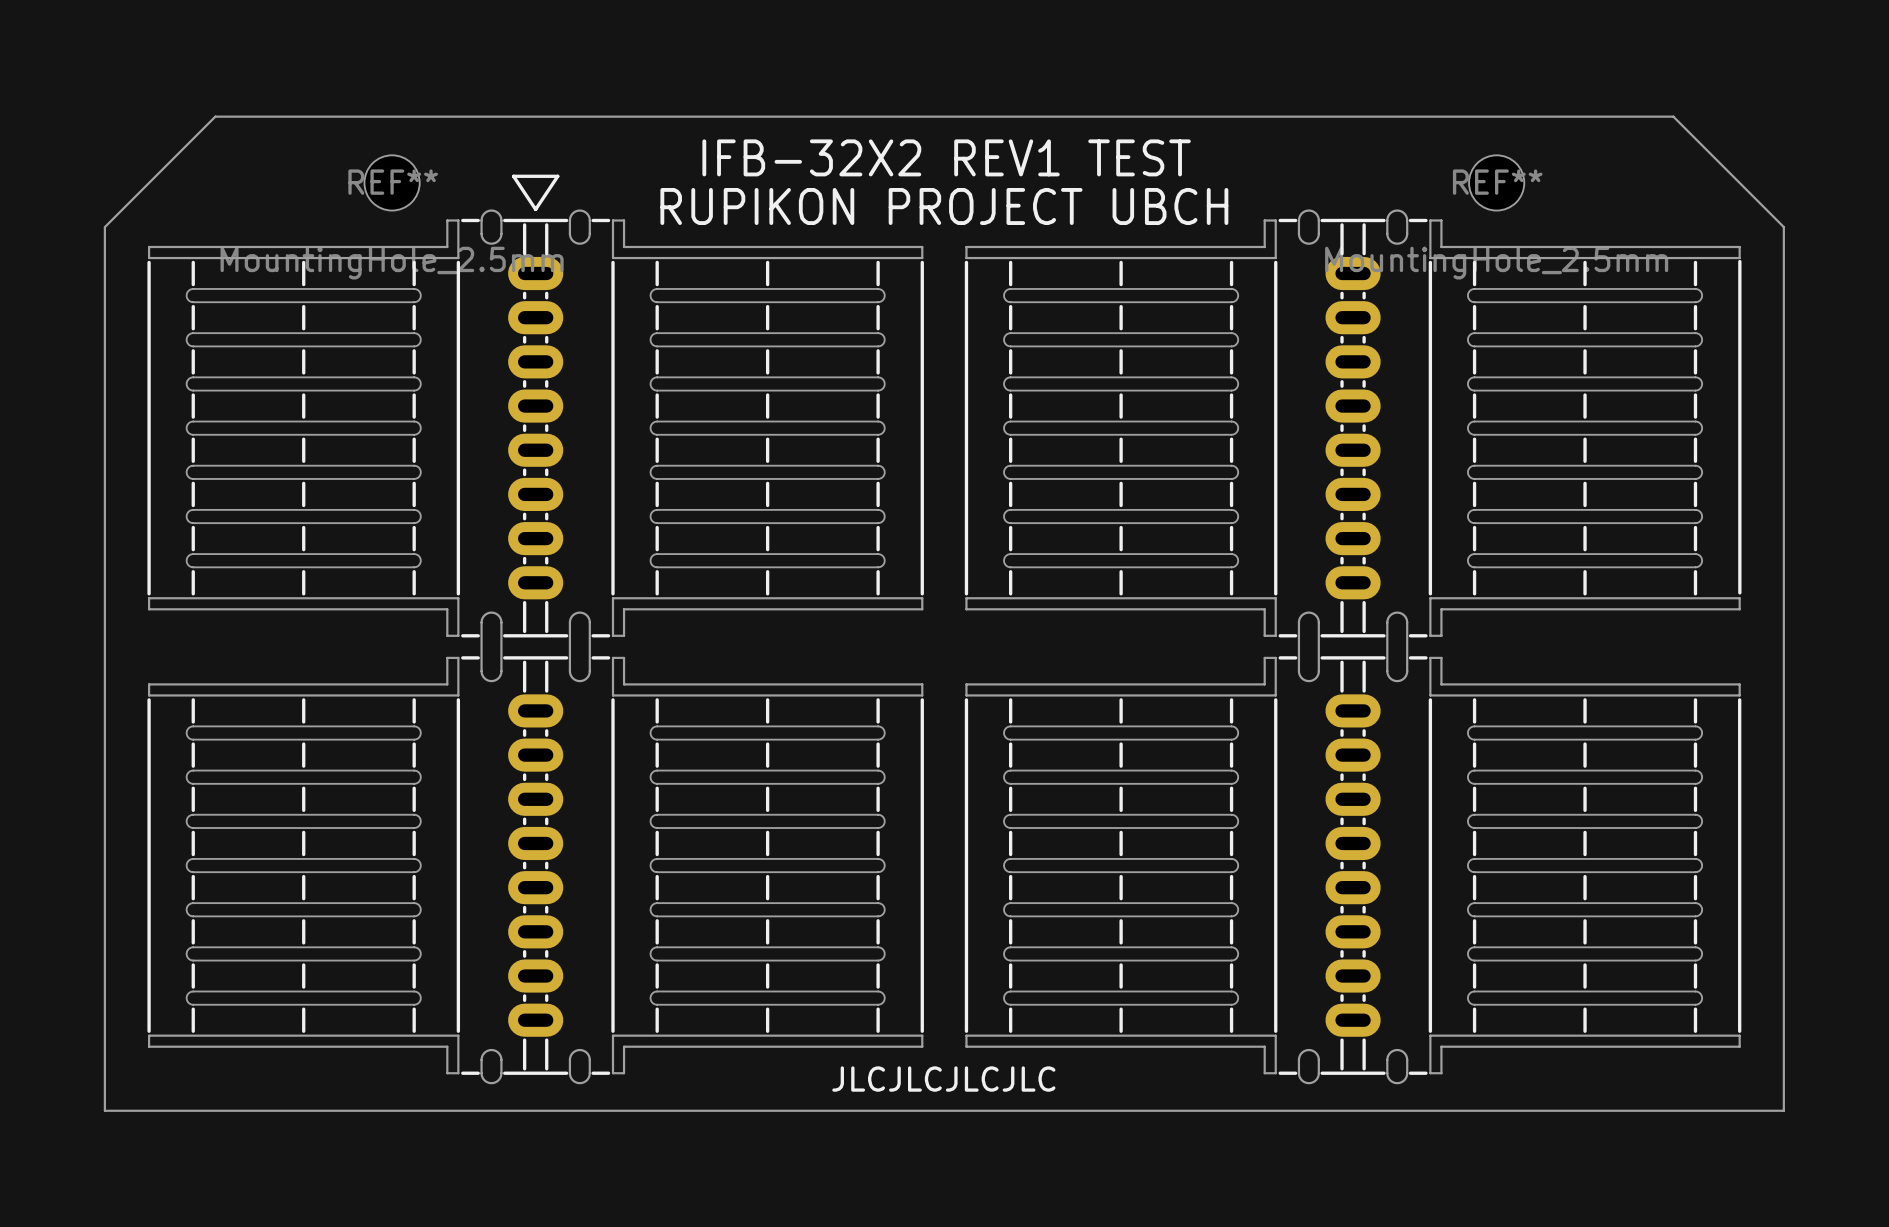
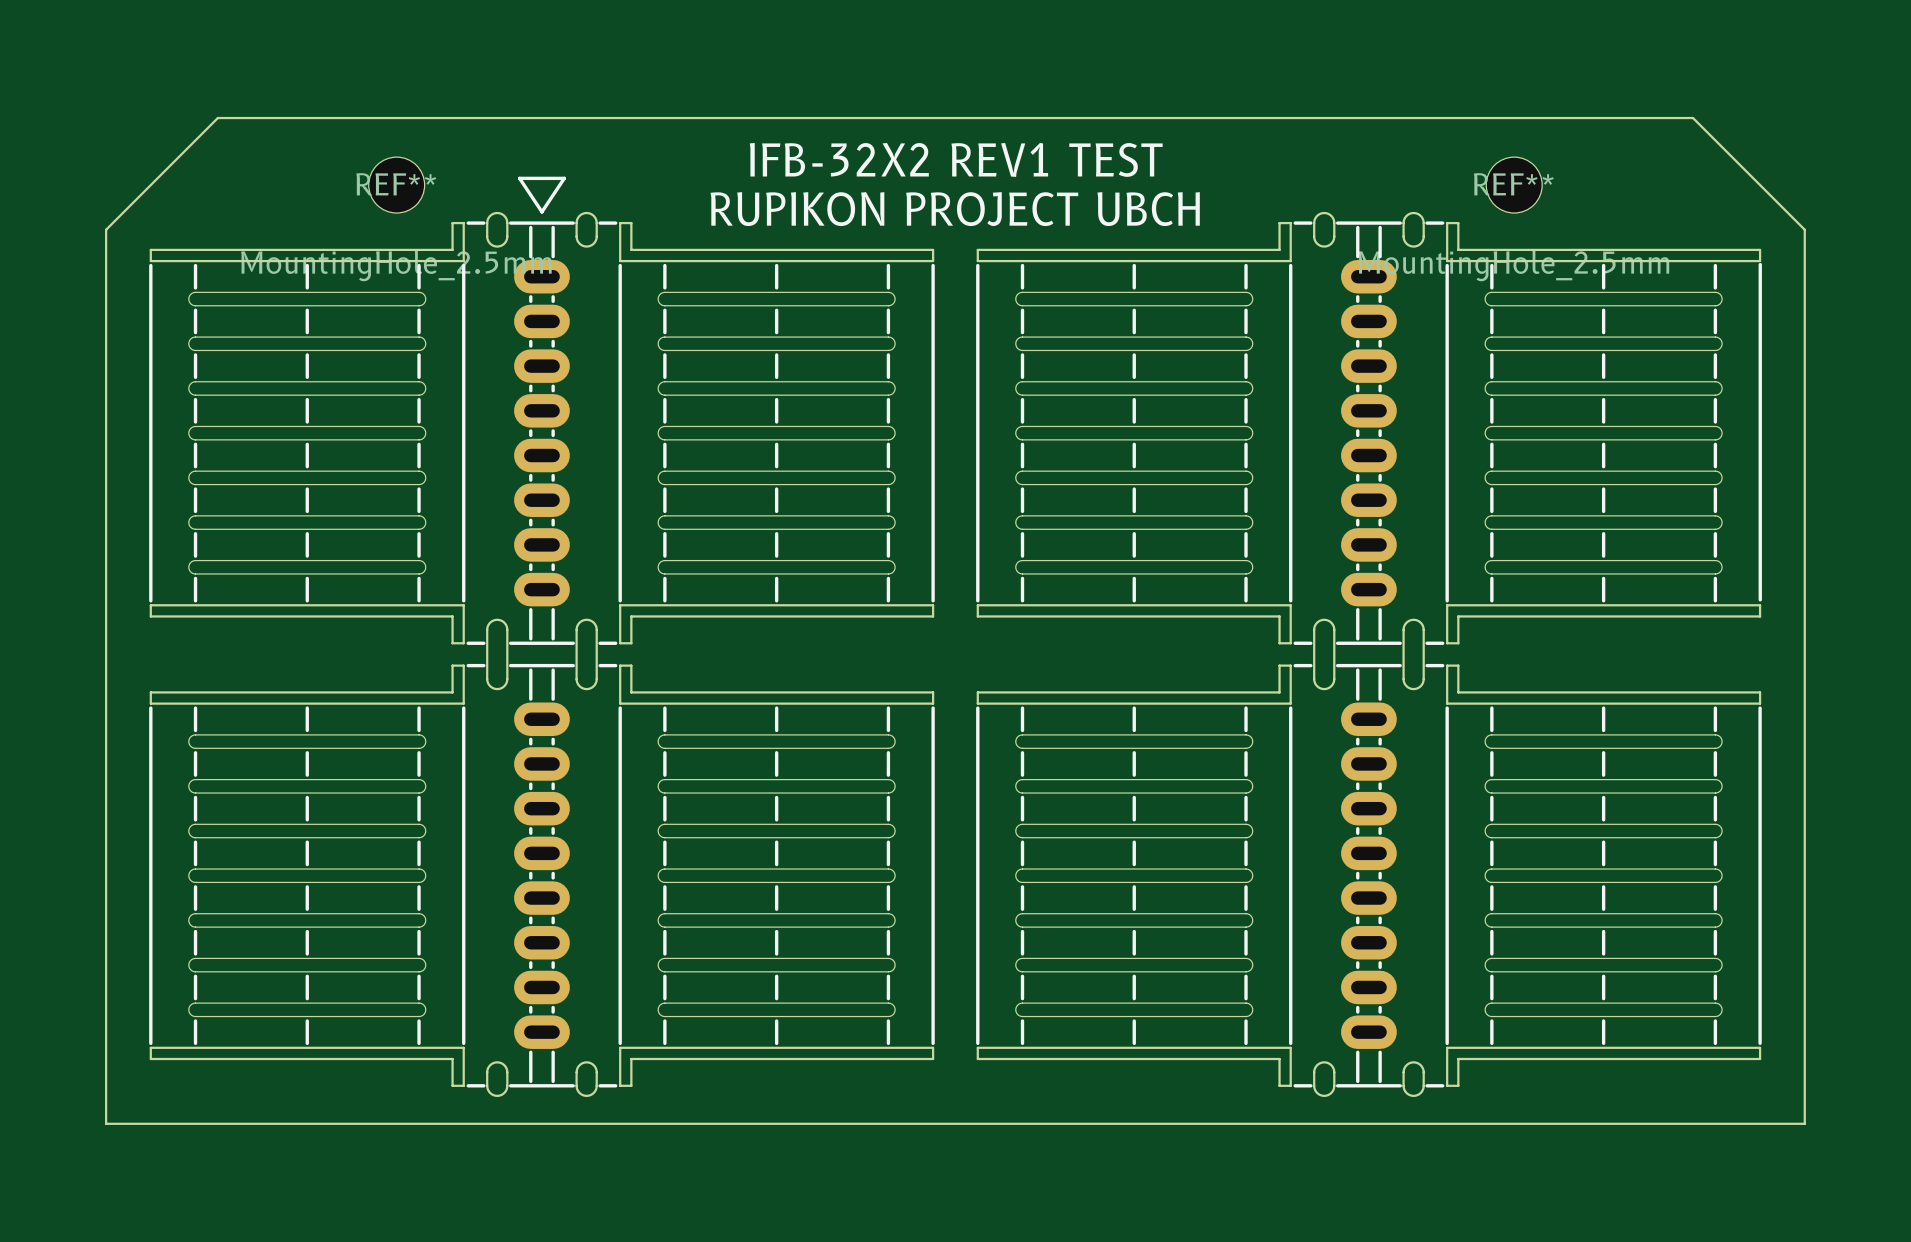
text: JLCJLCJLCJLC (943, 1079) -> none

